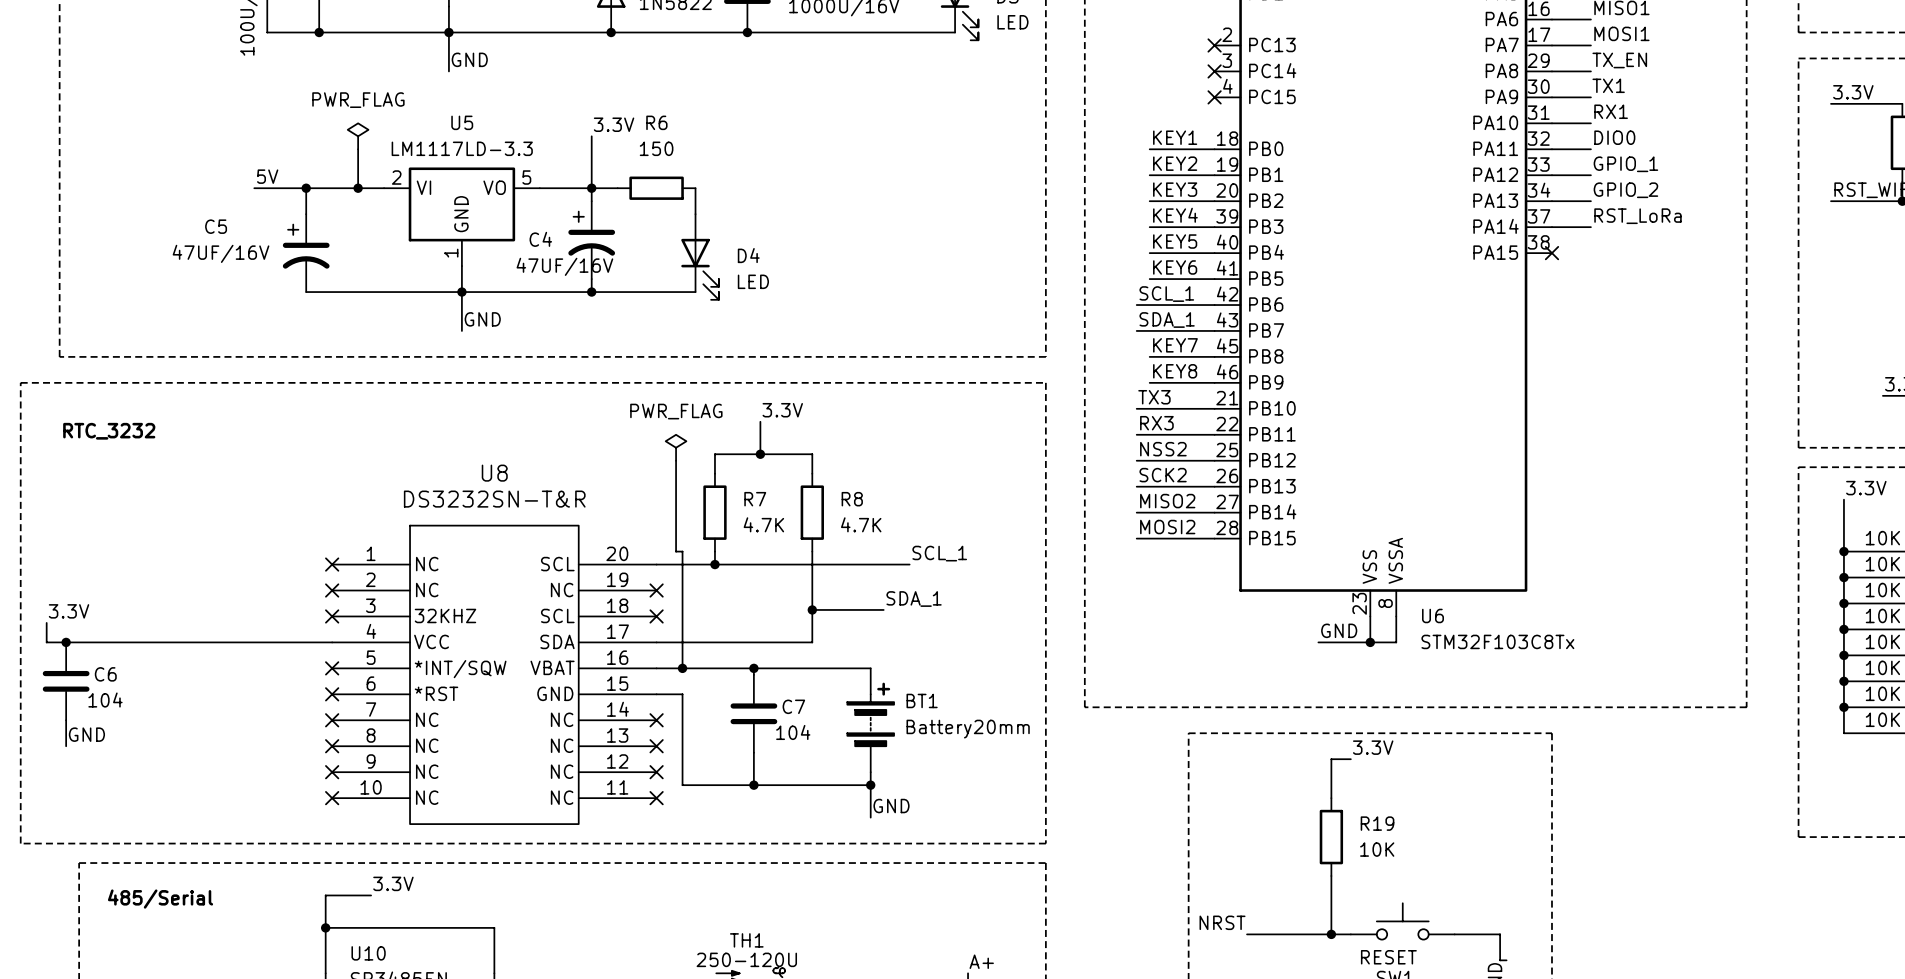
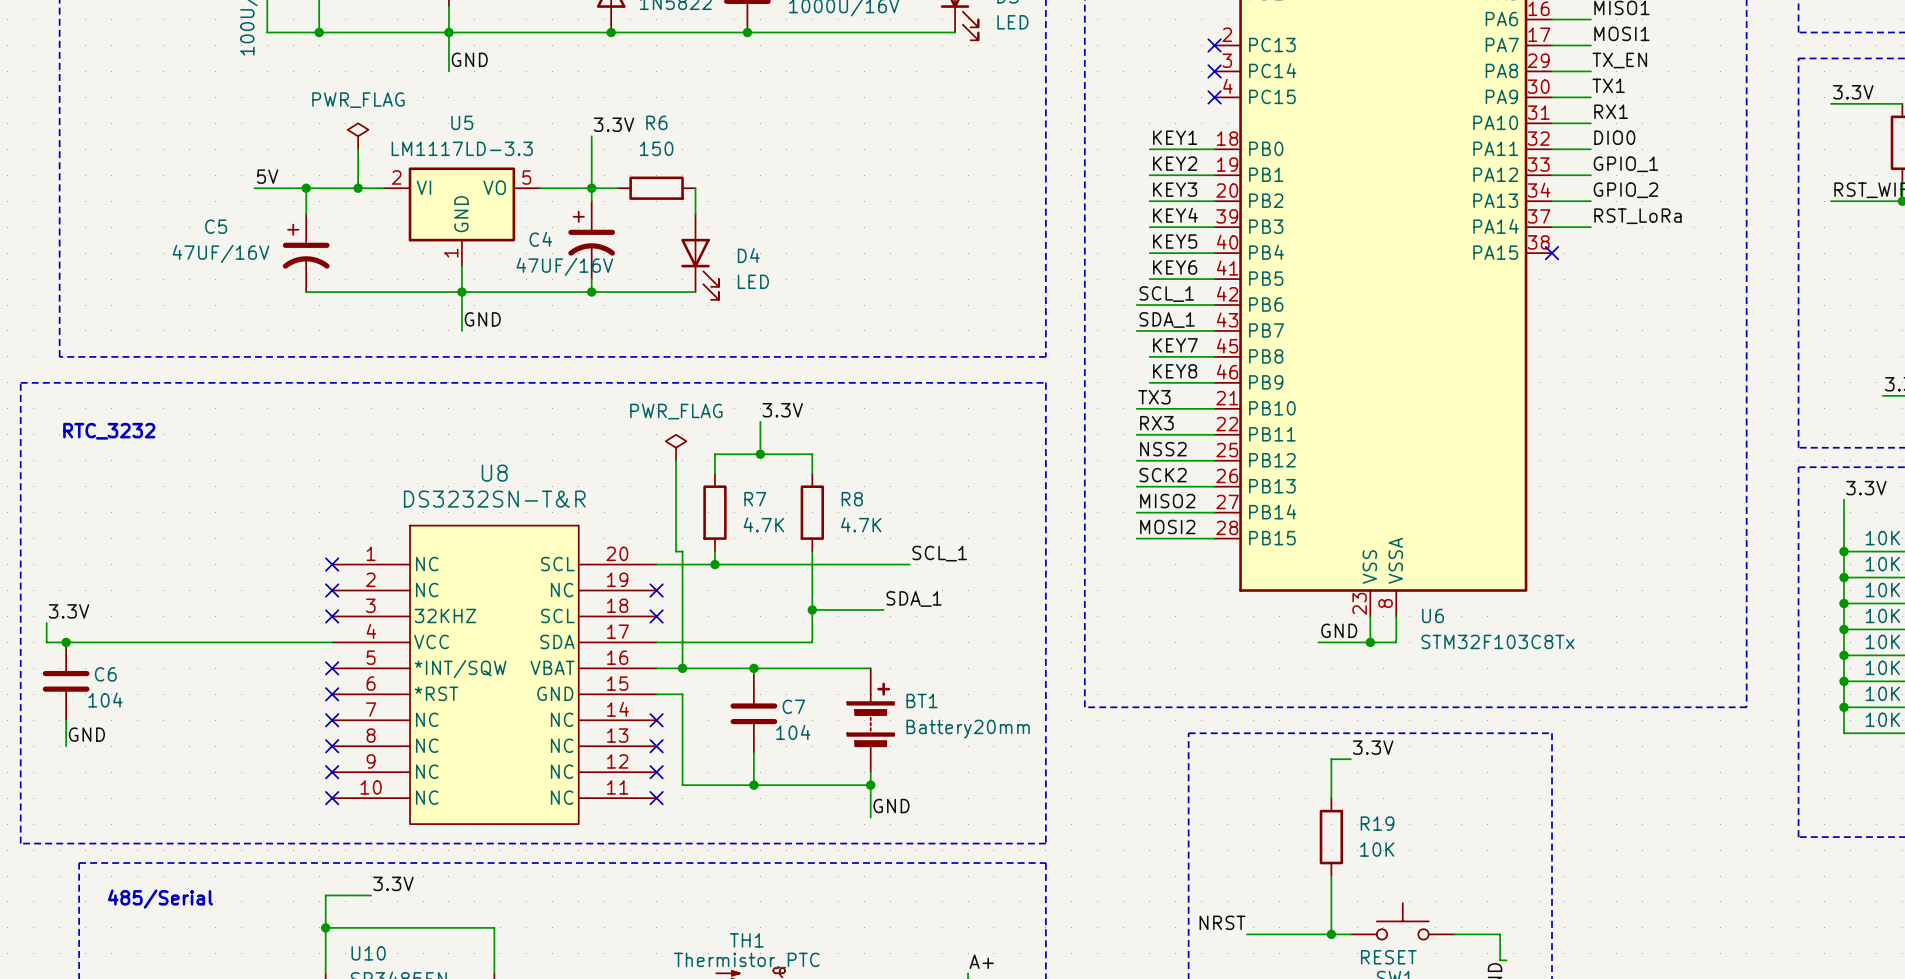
TH1 value: 250-120U (746, 959) -> Thermistor_PTC (746, 960)

